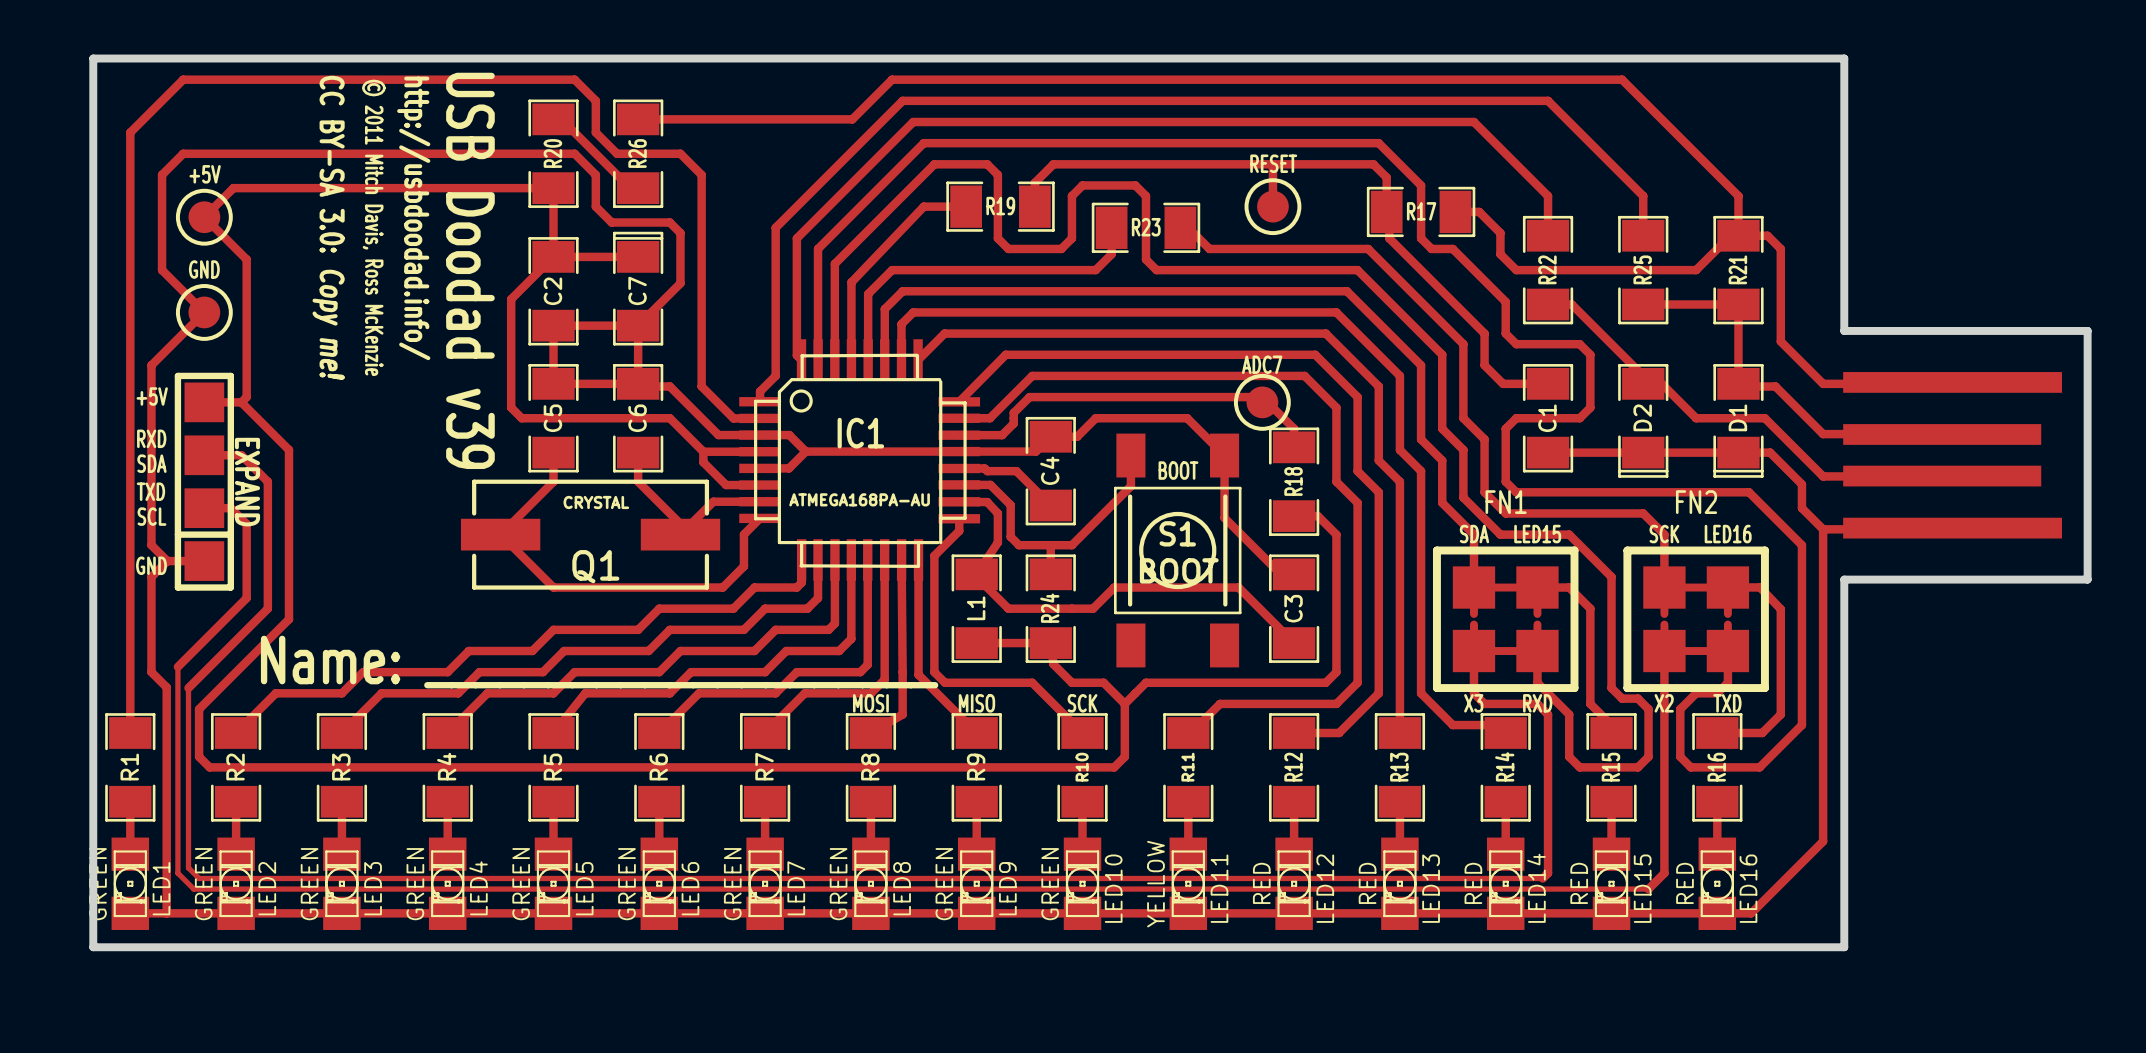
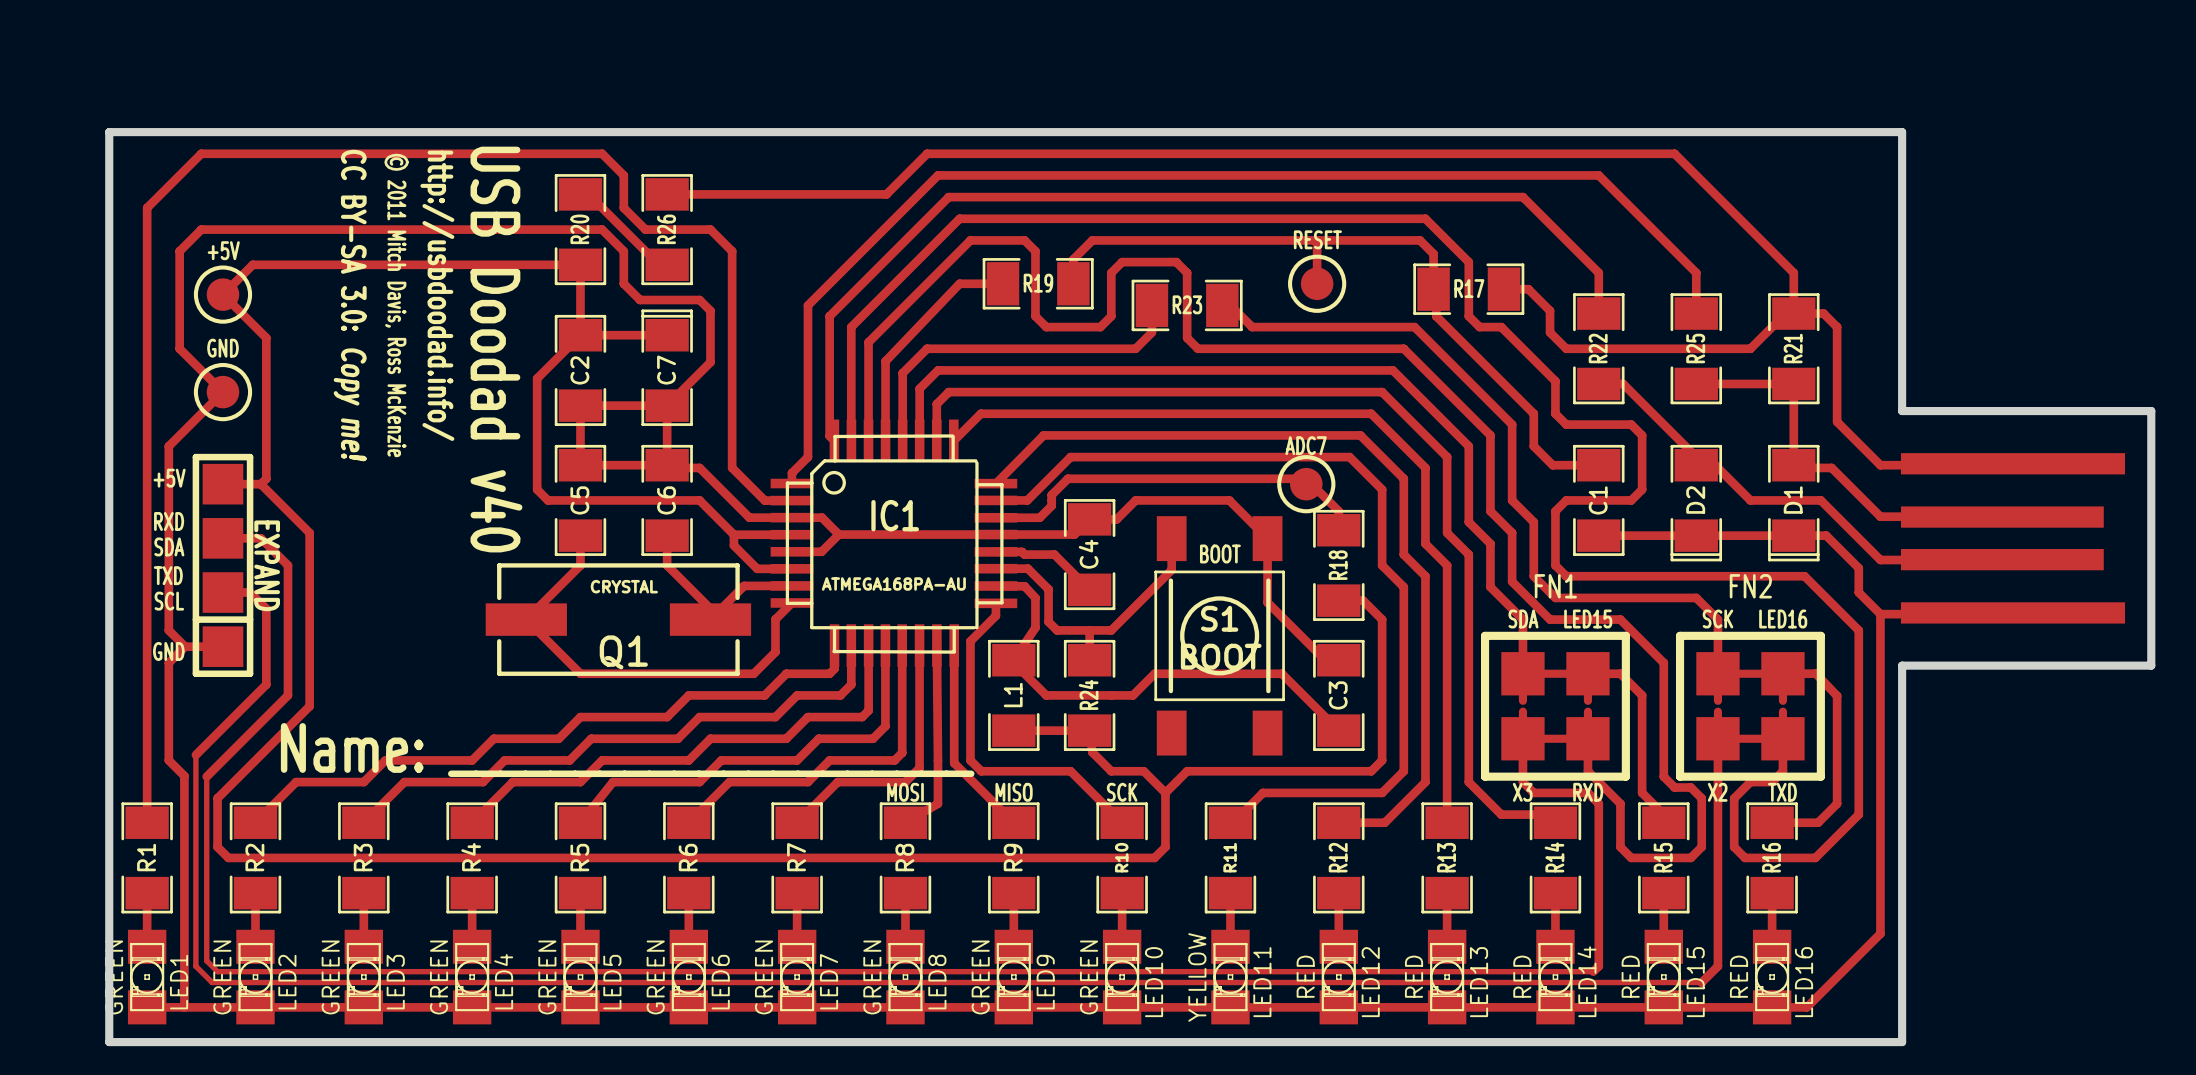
text: USB Doodad v39 (470, 270) -> USB Doodad v40 (496, 349)

